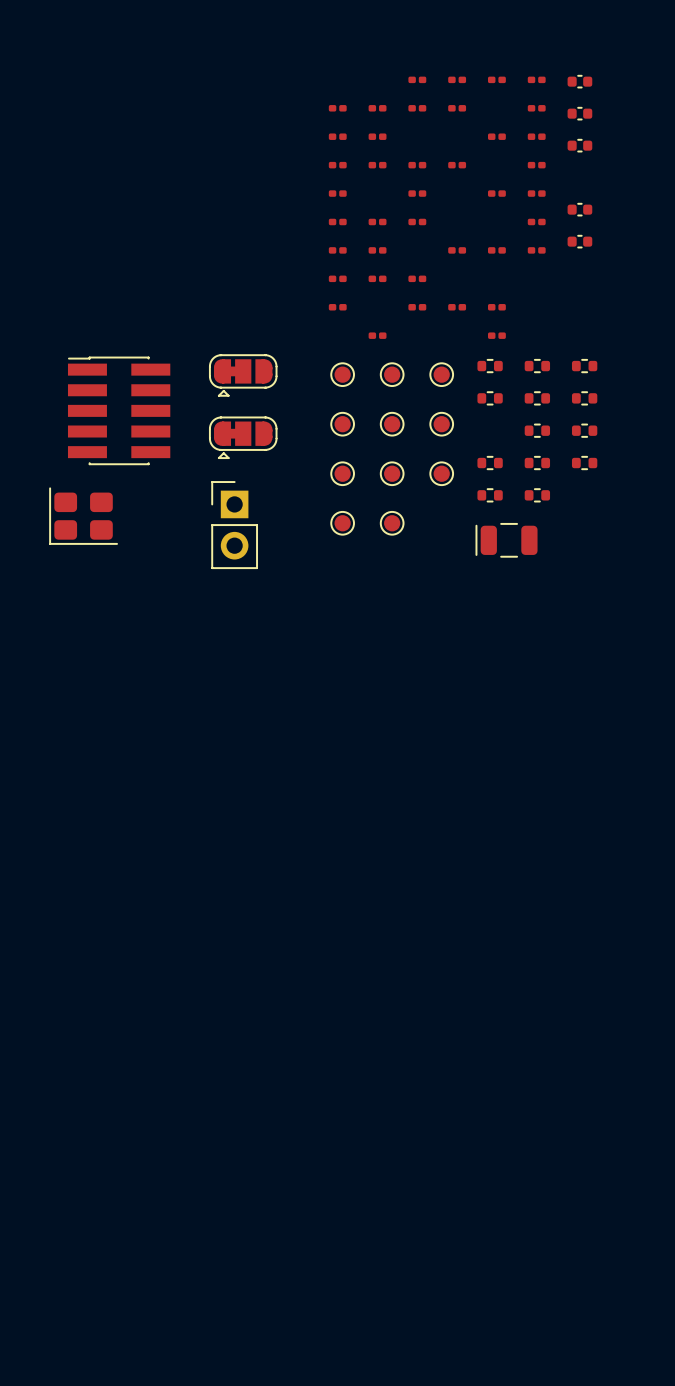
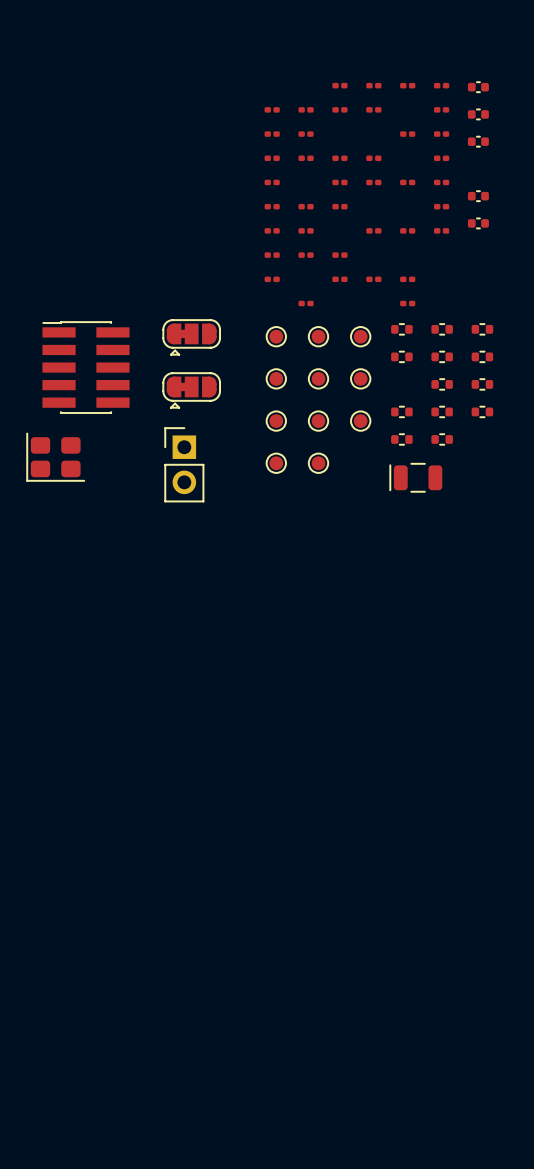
part: none -> (373, 182)

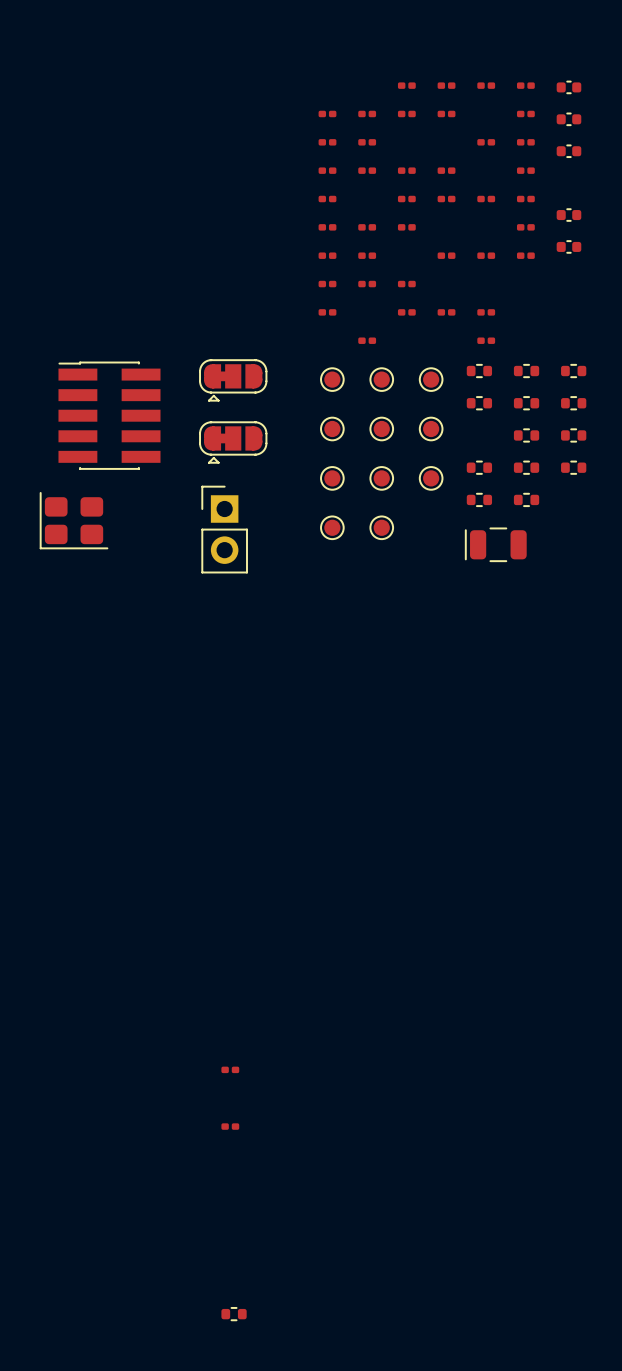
part: none -> (230, 1069)
part: none -> (230, 1126)
part: none -> (234, 1314)

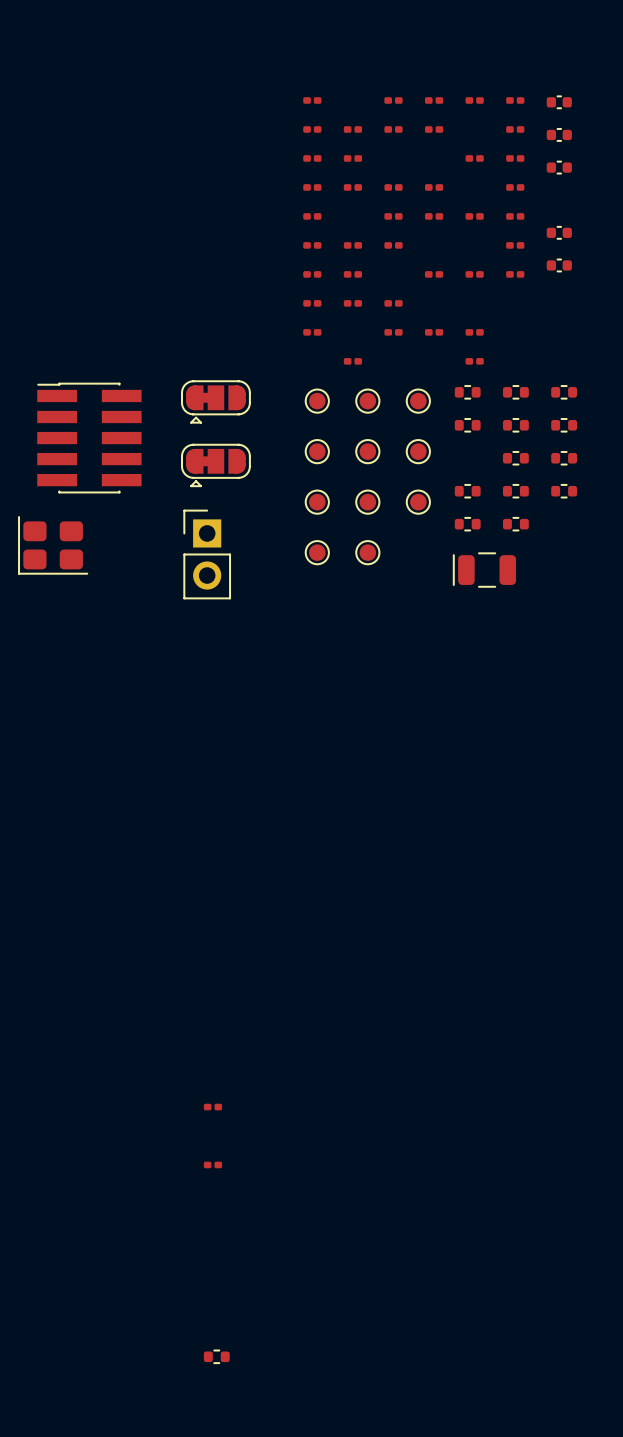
part: none -> (312, 100)

